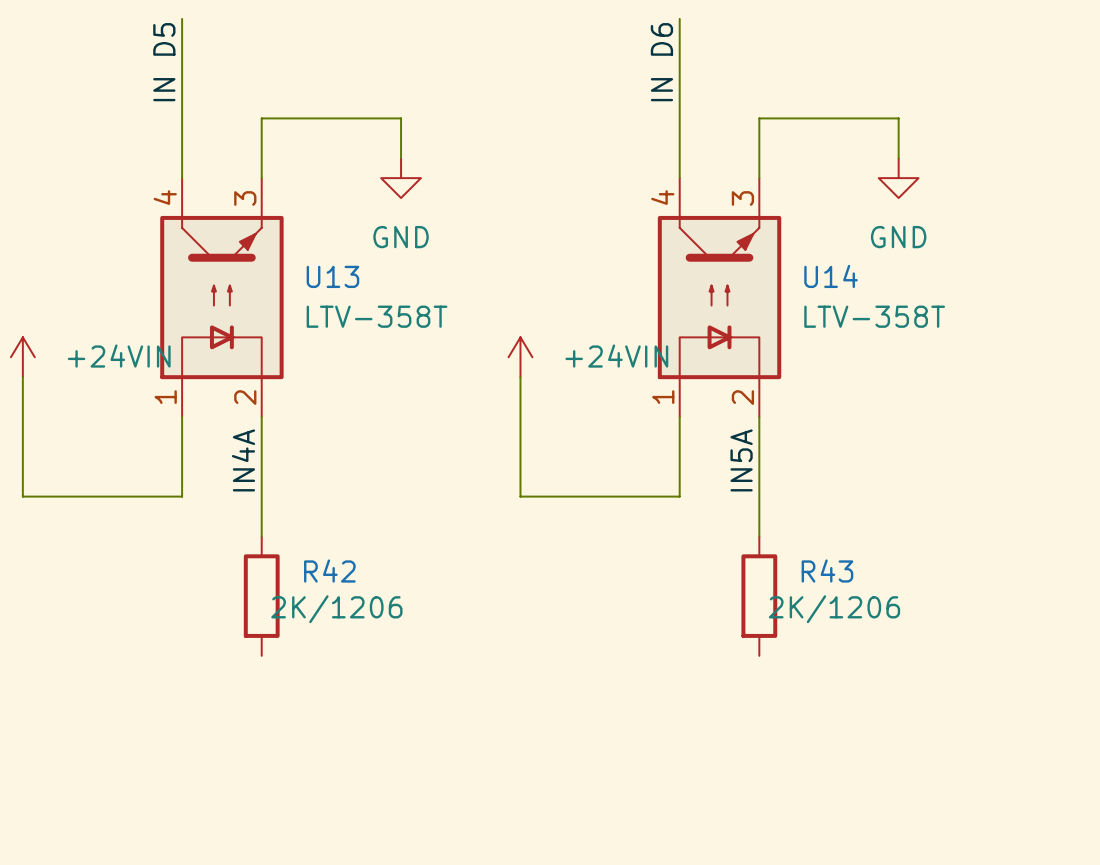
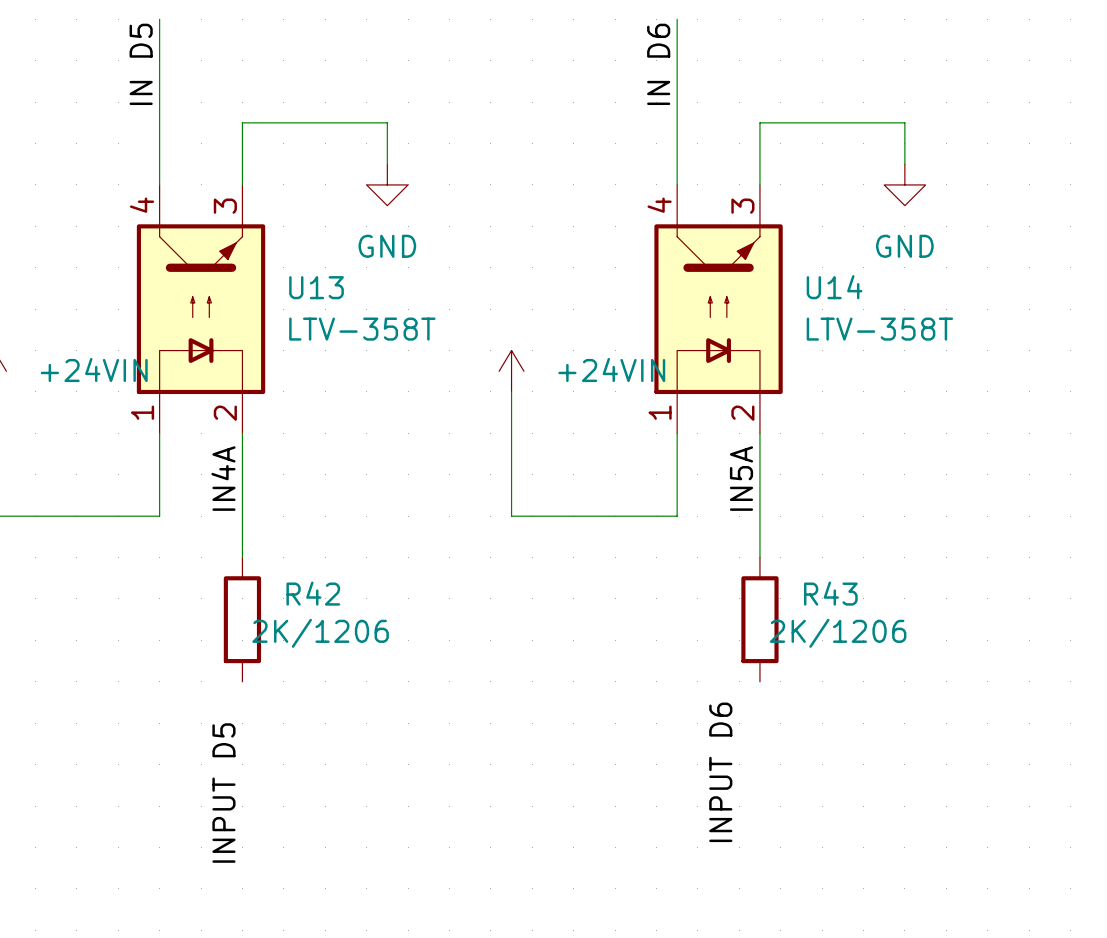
label: none -> INPUT D6 (720, 772)
label: none -> INPUT D5 (223, 793)

